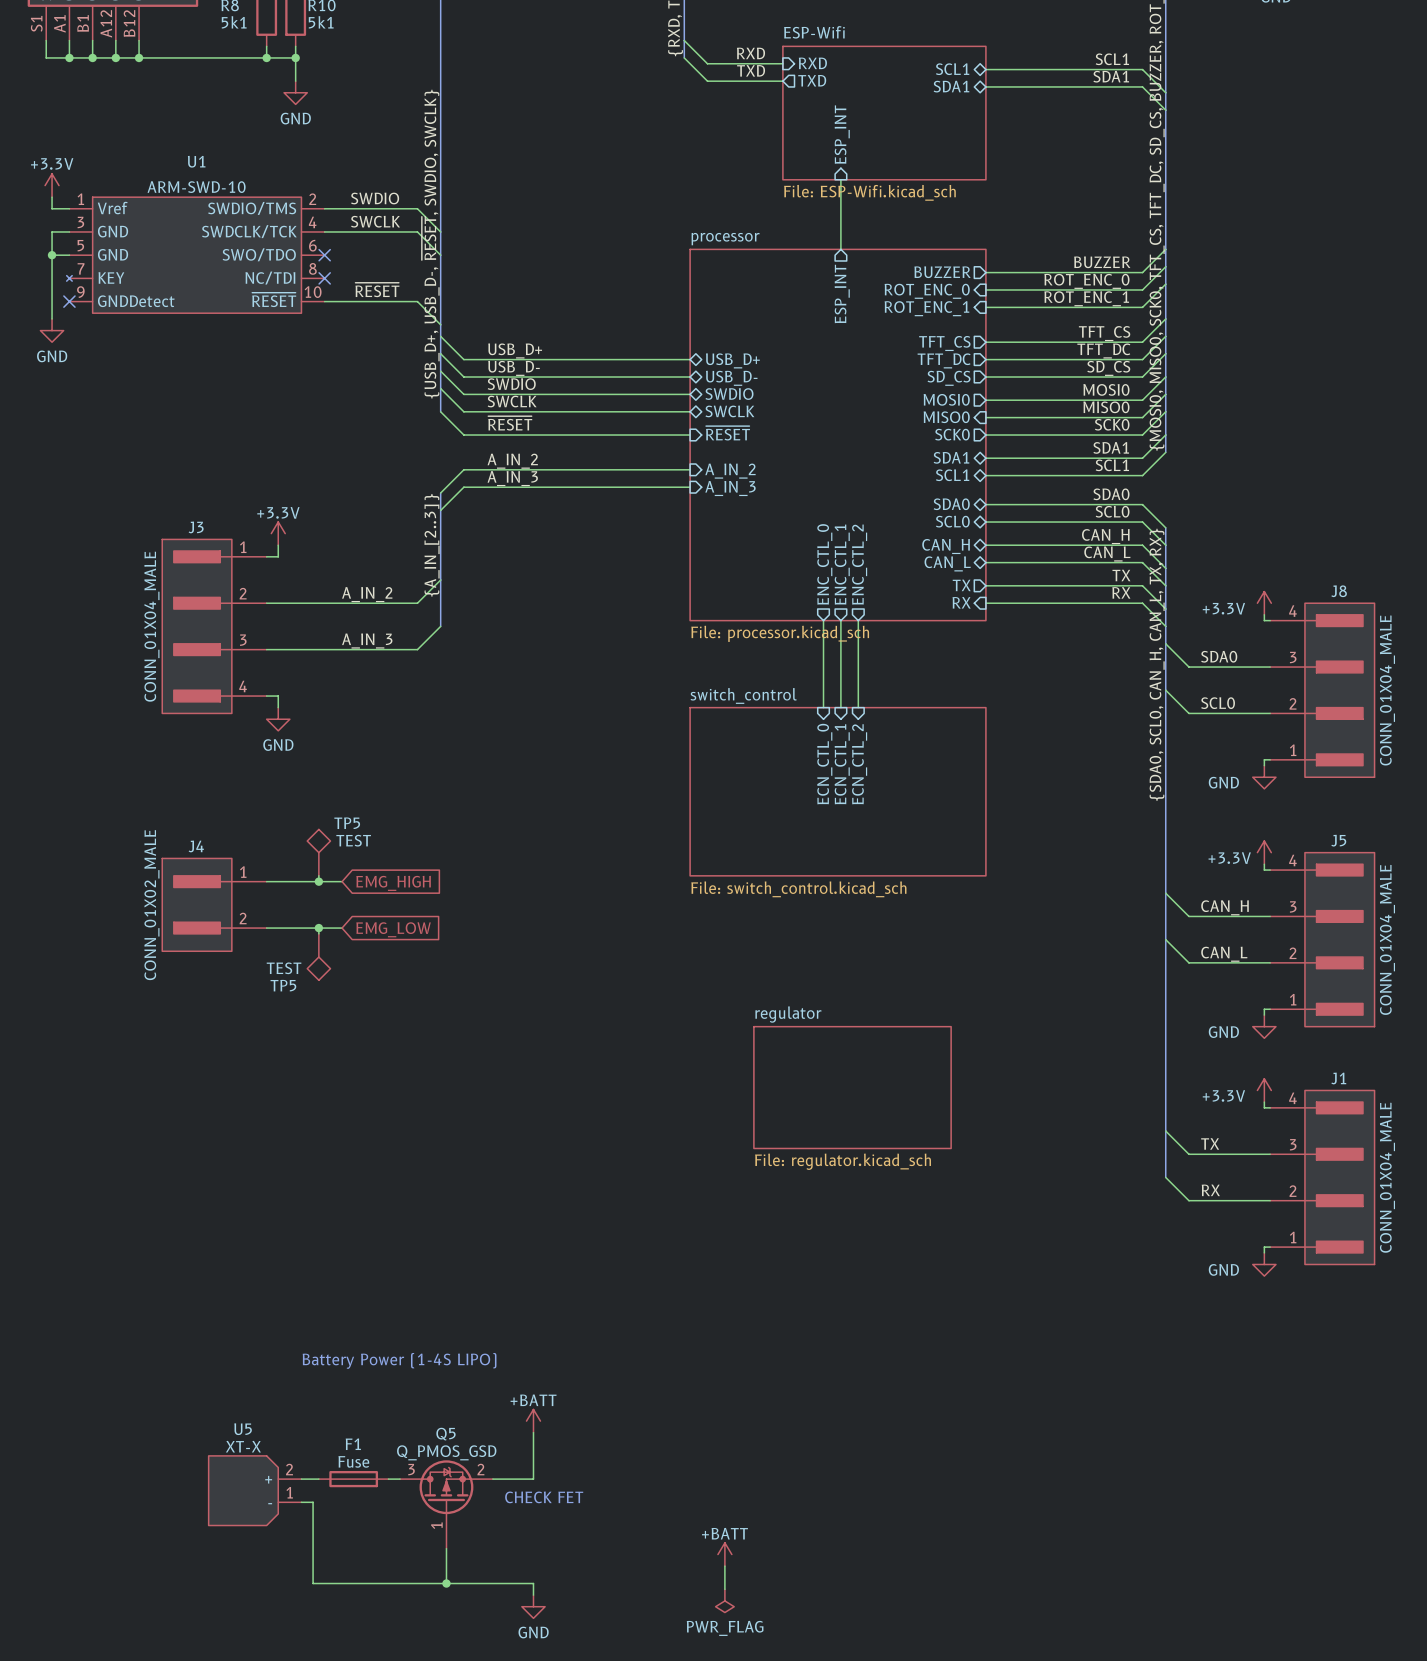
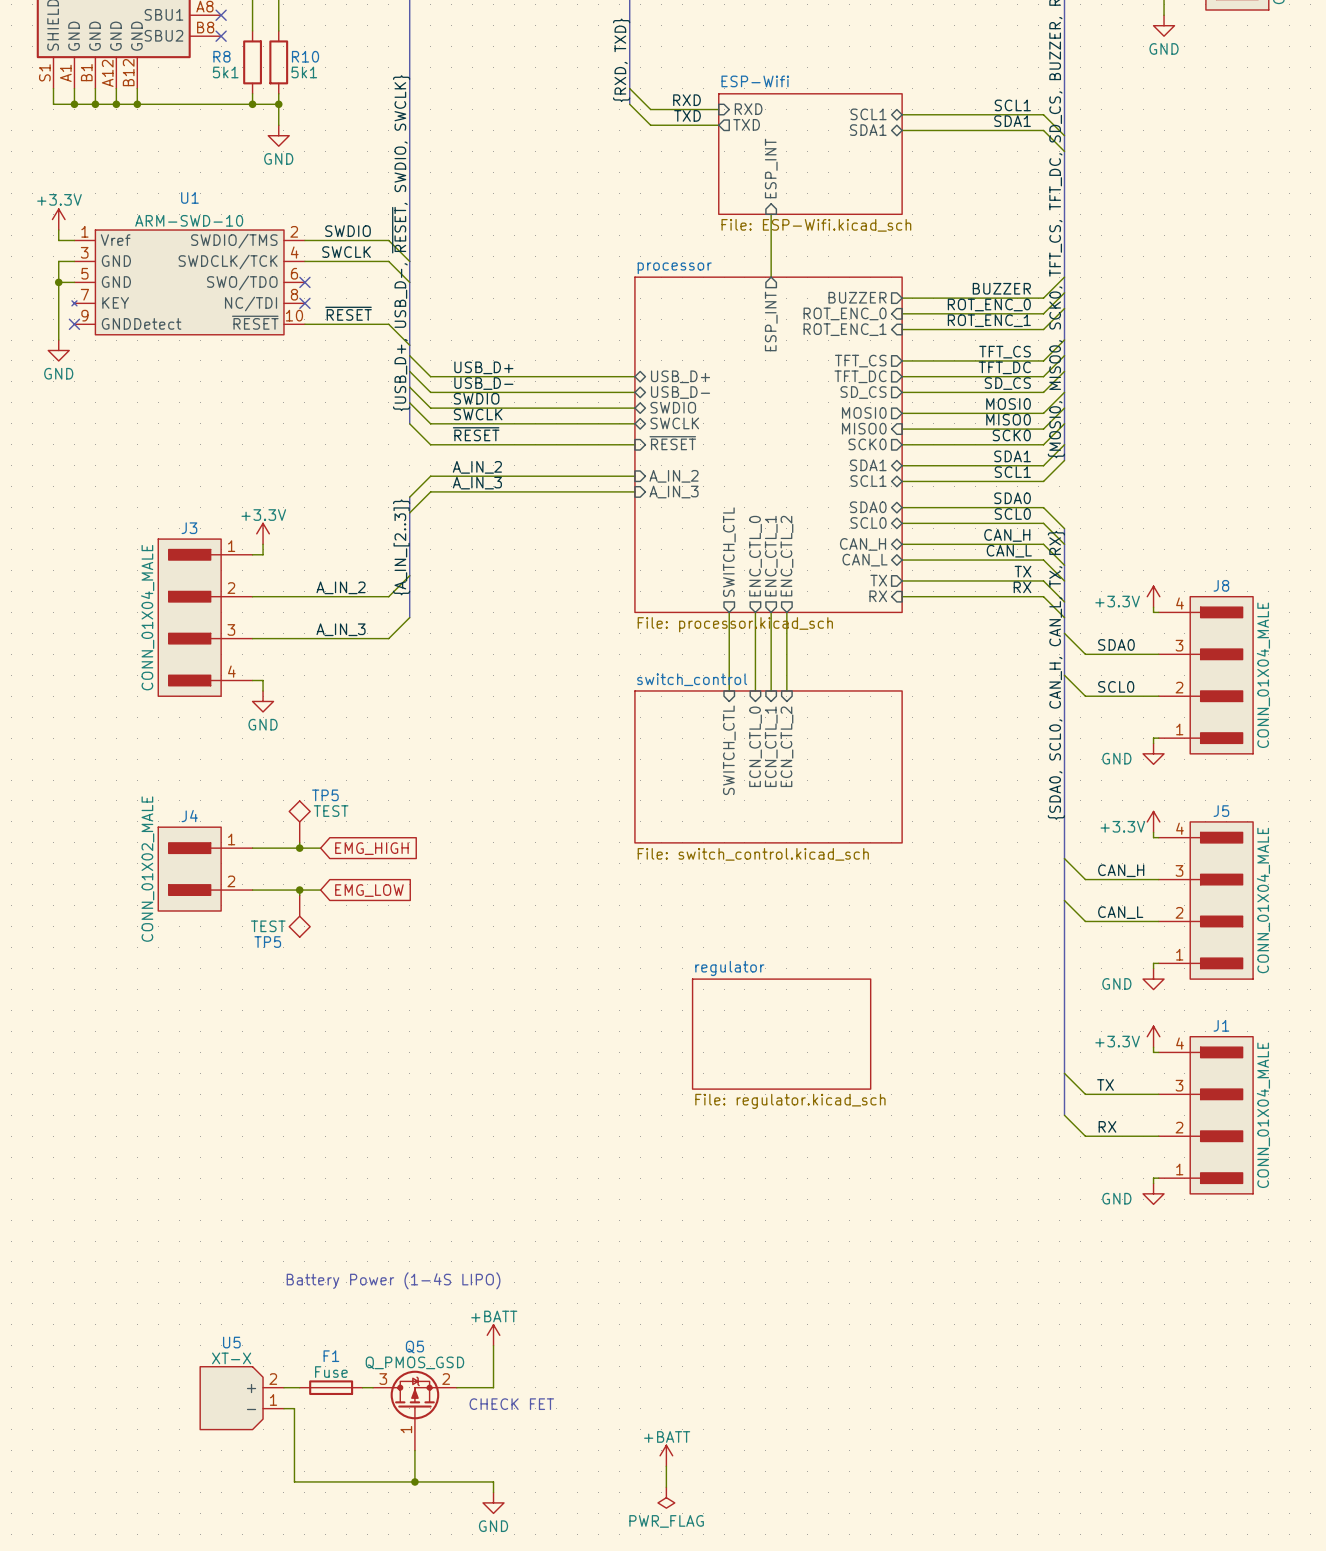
sheet pin: none -> SWITCH_CTL (729, 552)
wire: none -> (729, 612) (729, 690)
sheet pin: none -> SWITCH_CTL (729, 750)

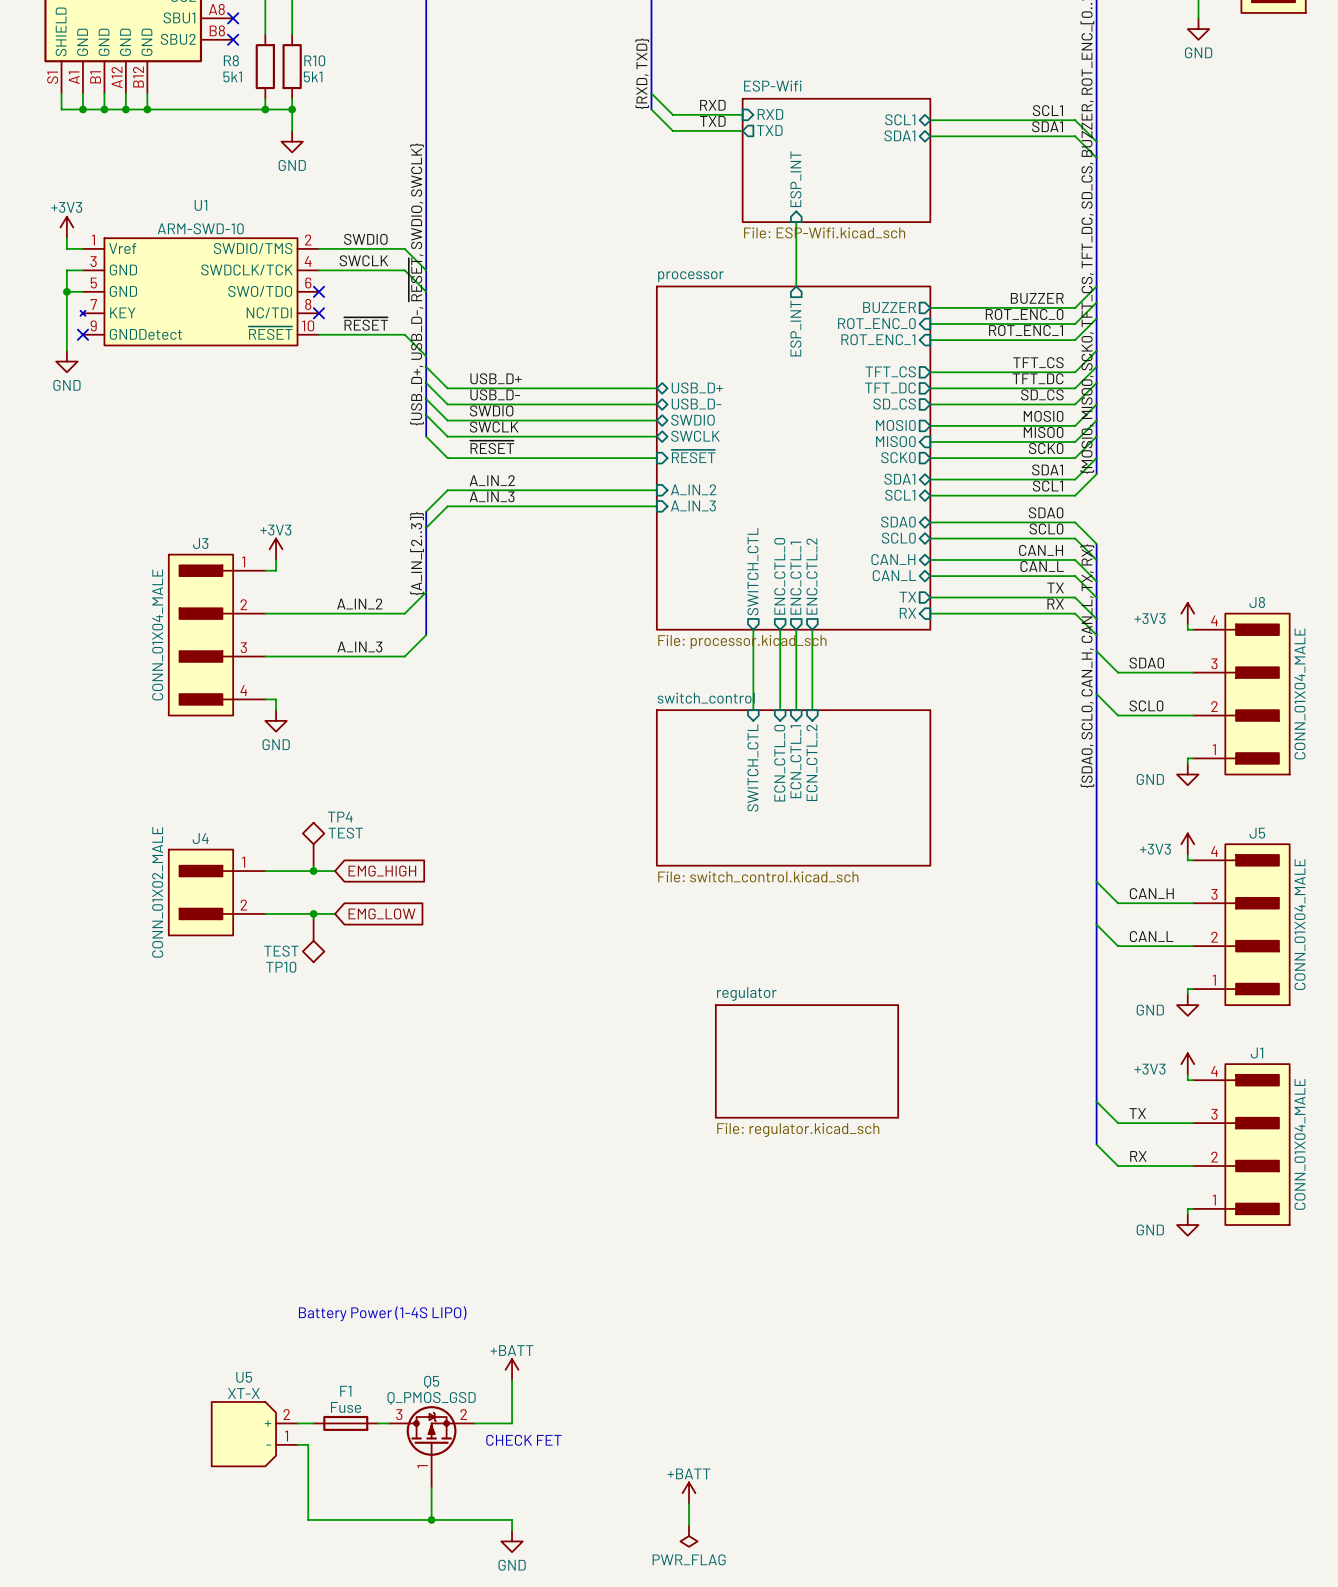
power symbol: +3.3V (58, 219) -> +3V3 (66, 227)
power symbol: +3.3V (263, 533) -> +3V3 (276, 549)
power symbol: +3.3V (1153, 596) -> +3V3 (1187, 613)
TP5 name: TP5 (325, 795) -> TP4 (340, 817)
power symbol: +3.3V (1153, 821) -> +3V3 (1187, 844)
TP5 name: TP5 (267, 942) -> TP10 (281, 967)
power symbol: +3.3V (1153, 1036) -> +3V3 (1187, 1064)

